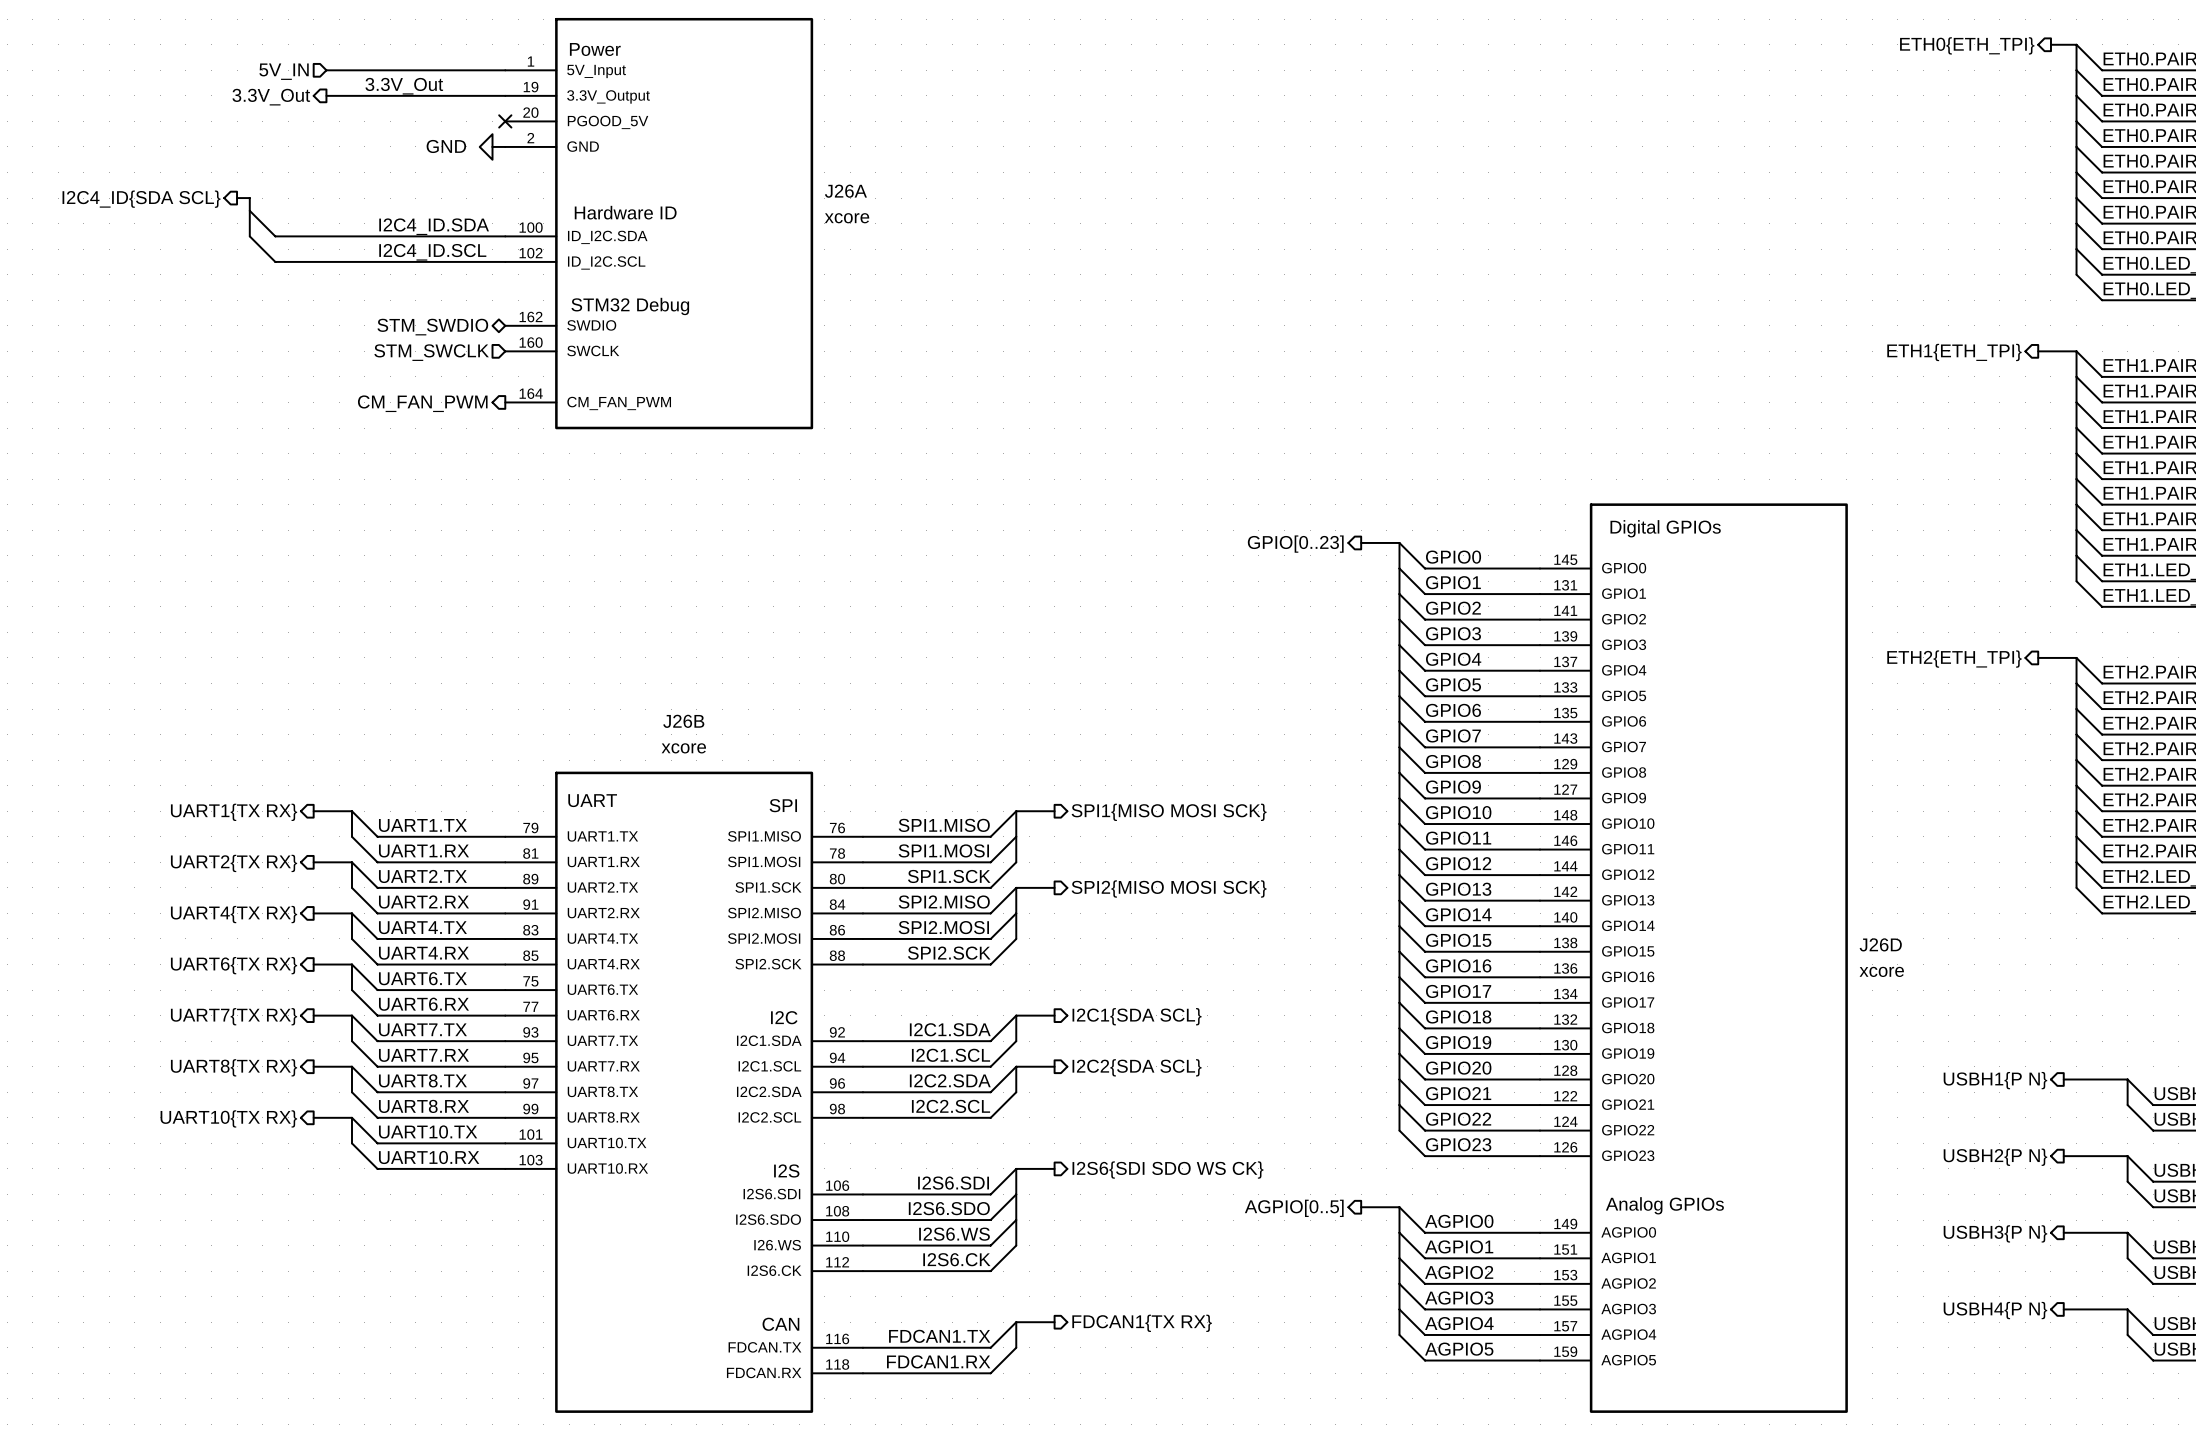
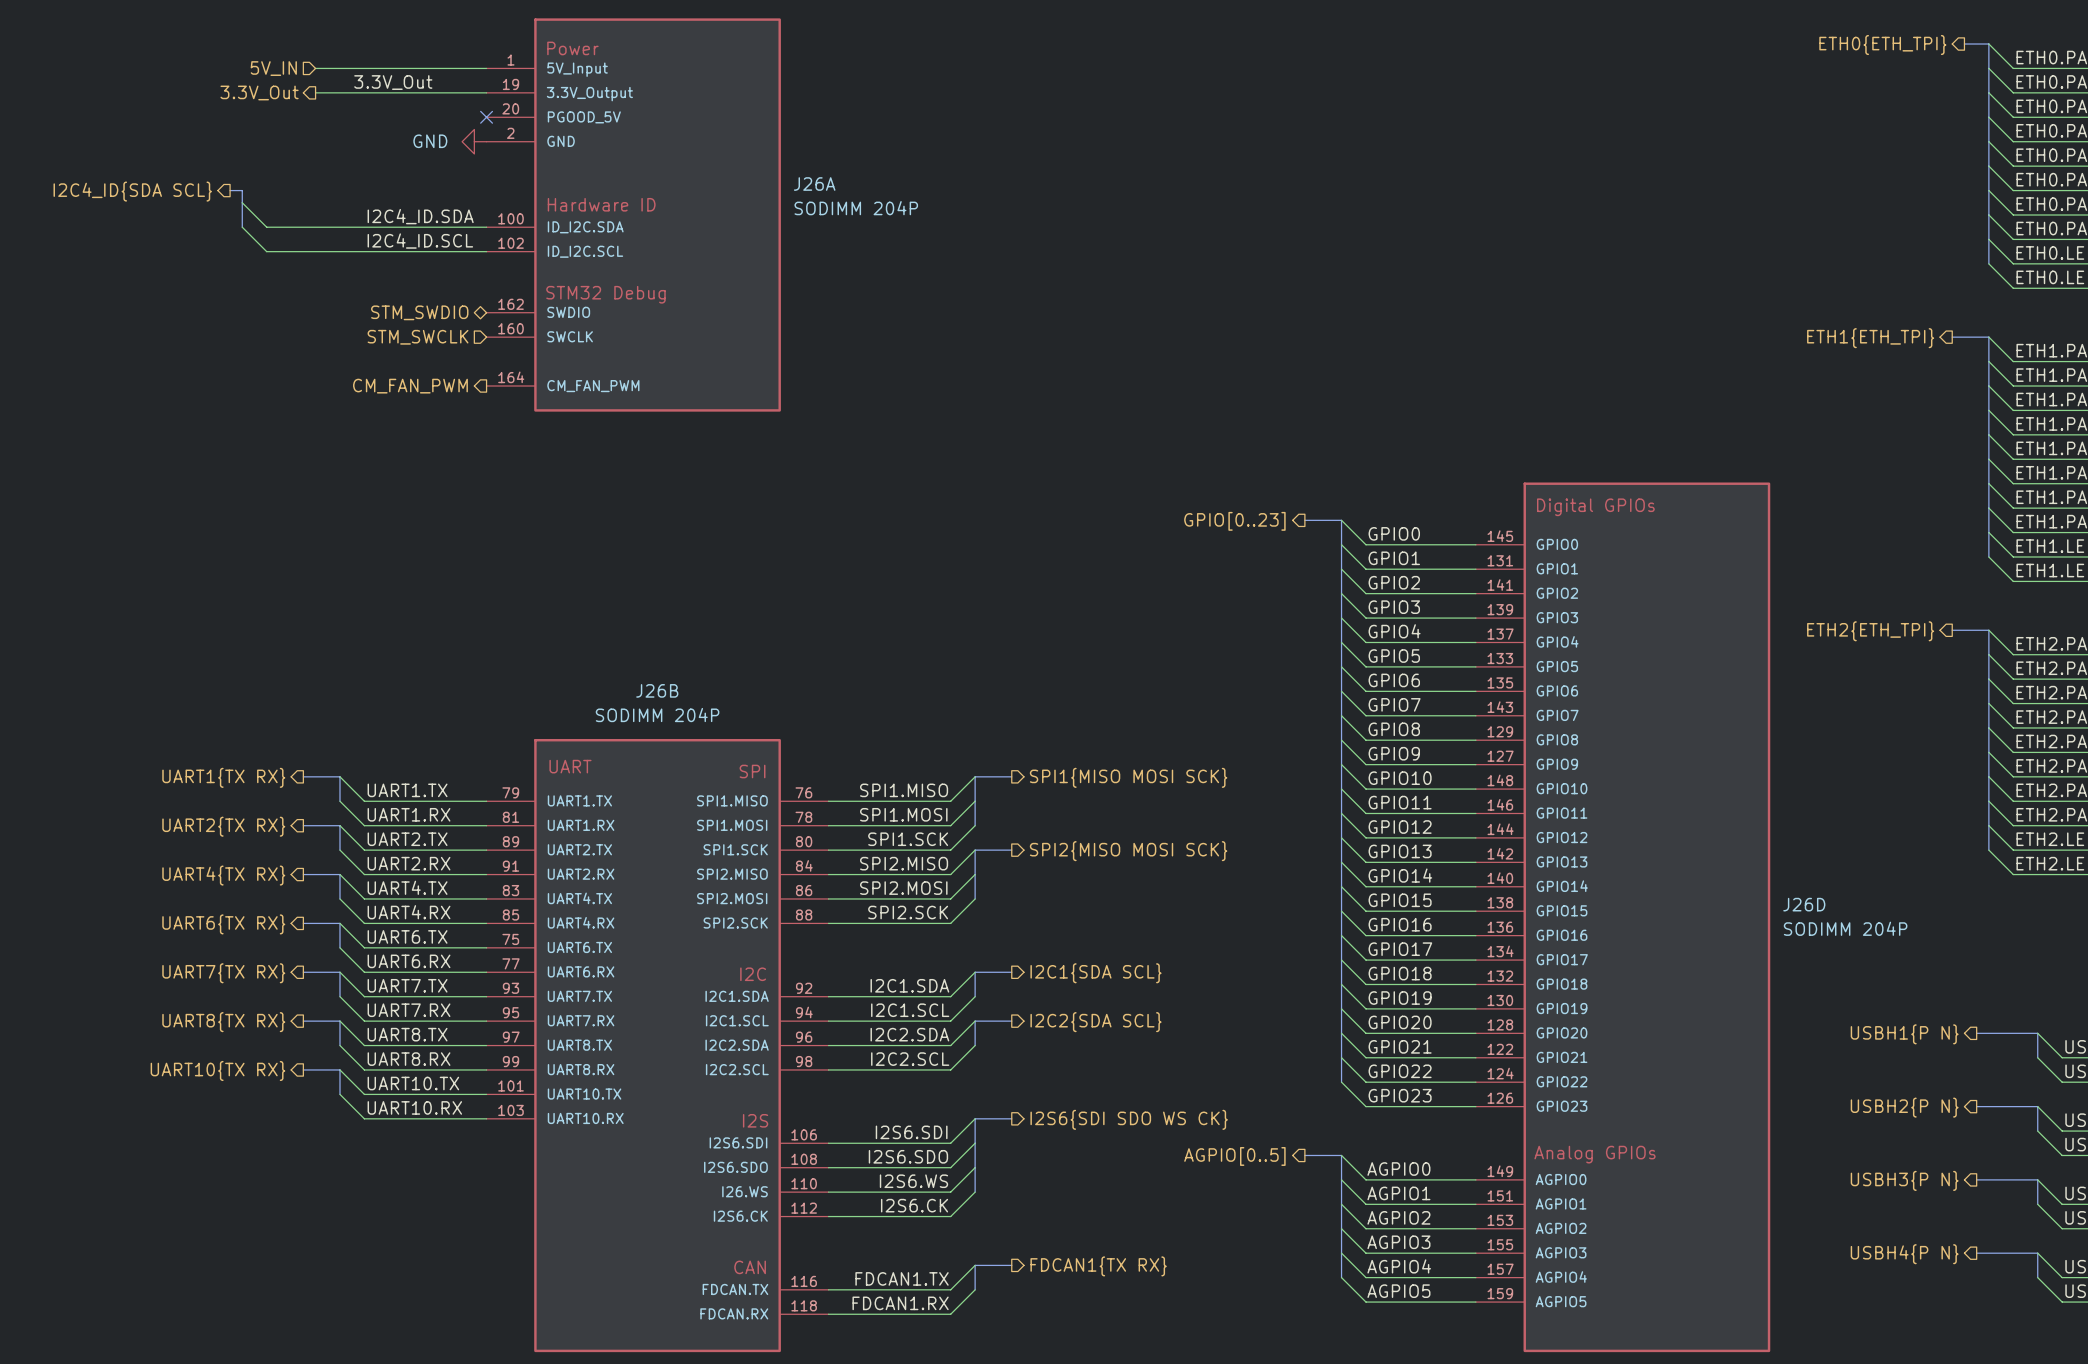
J26A value: xcore (847, 218) -> SODIMM 204P (856, 208)
J26B value: xcore (683, 748) -> SODIMM 204P (657, 715)
J26D value: xcore (1881, 971) -> SODIMM 204P (1845, 928)

